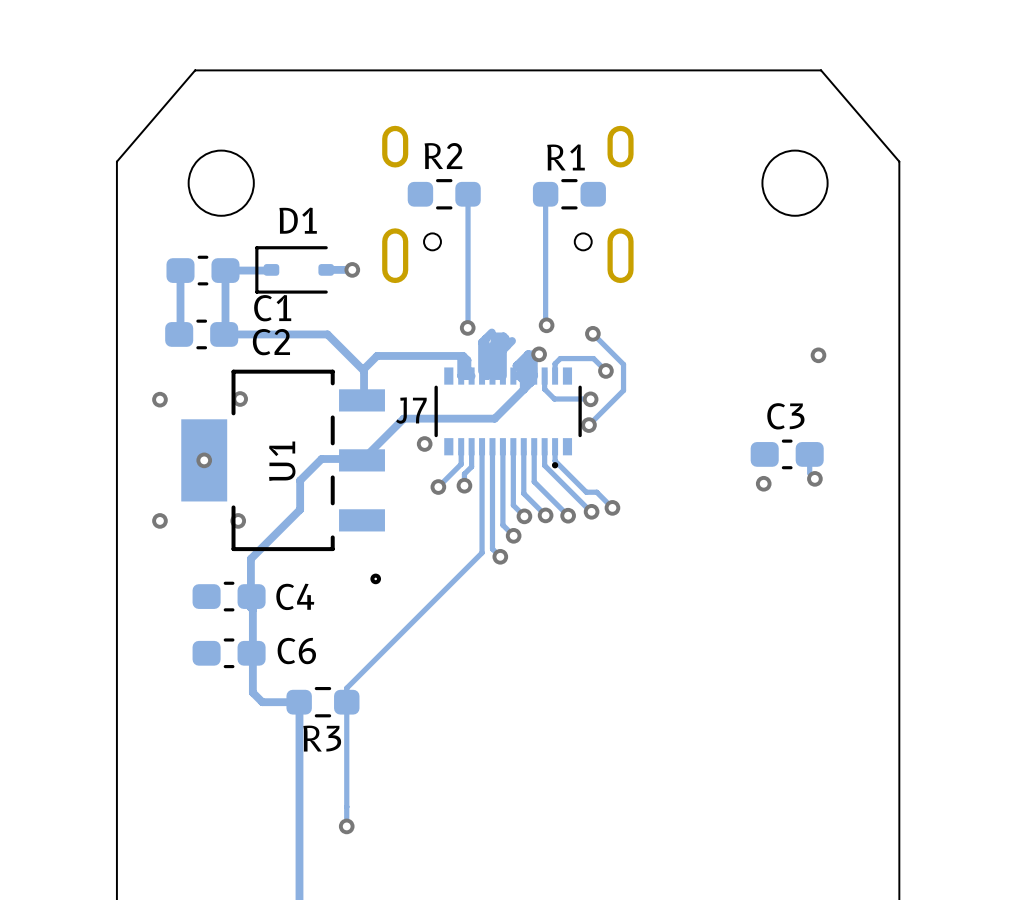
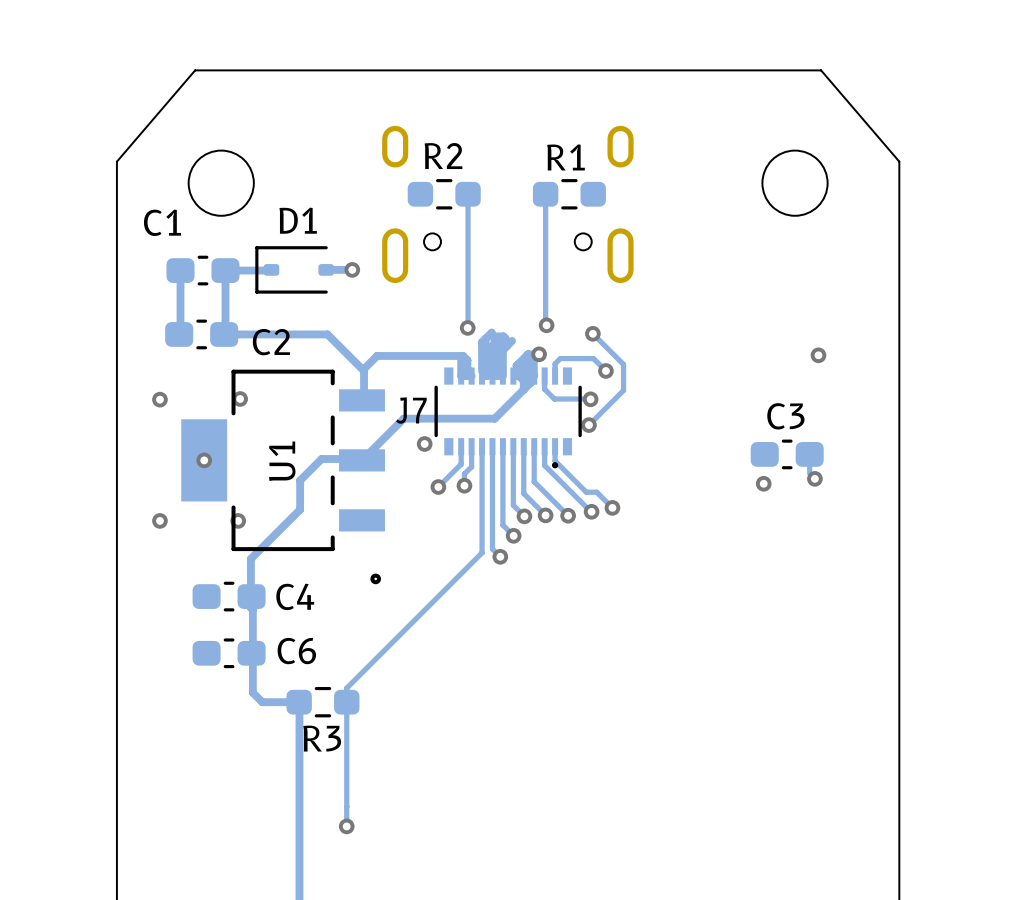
C1 name position: C1 (272, 308) -> C1 (162, 222)

